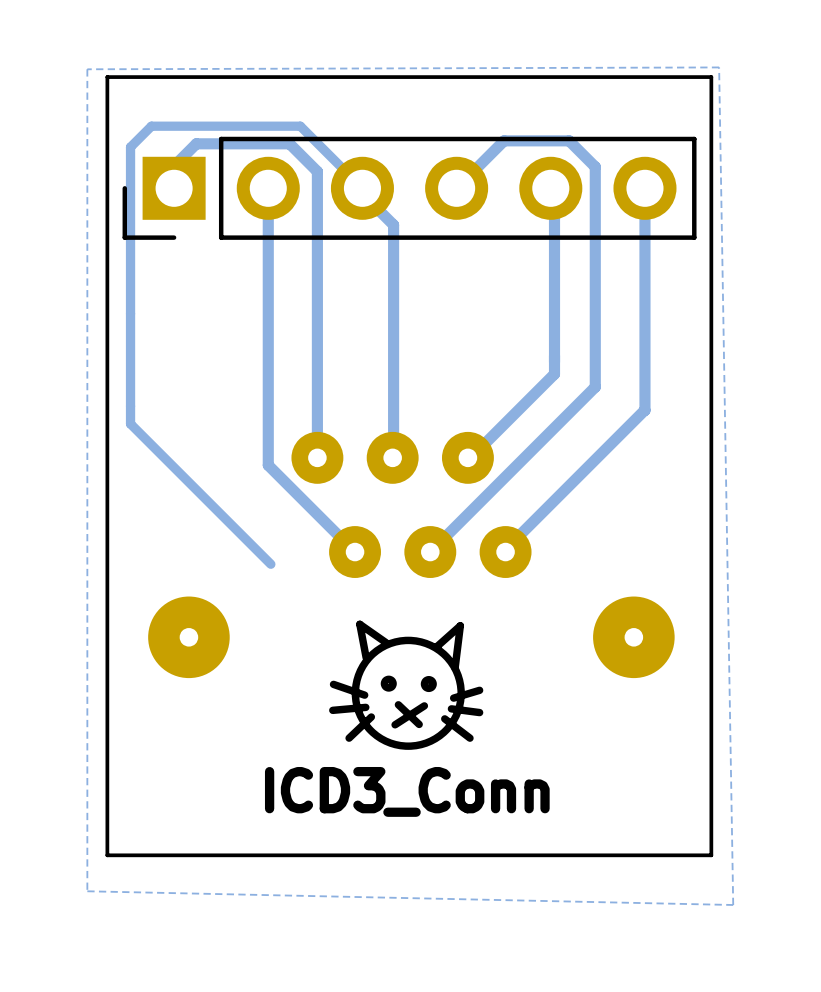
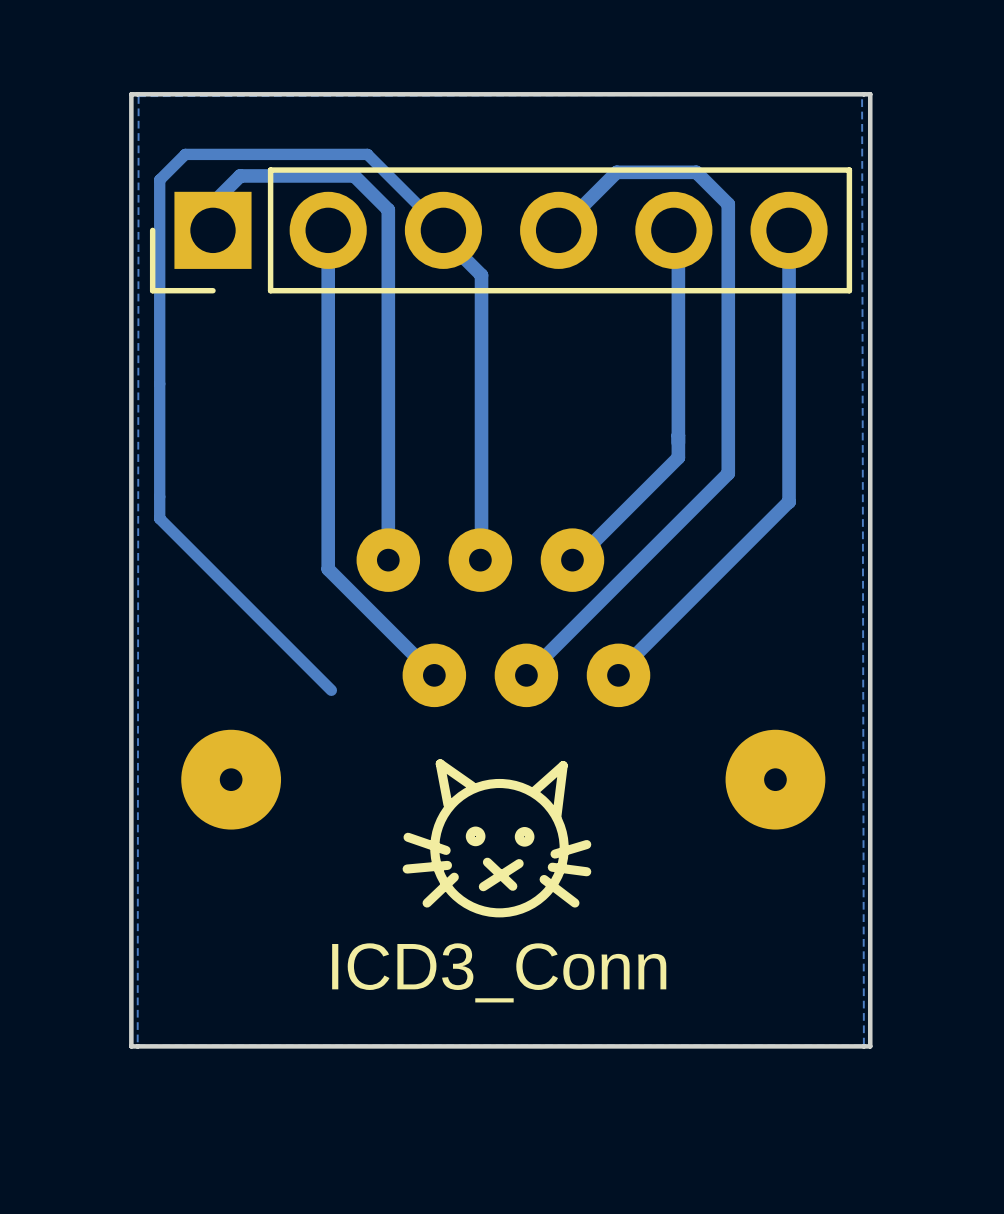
zone outline: (719, 67) (87, 69) (87, 891) (733, 905) (719, 67) -> (862, 94) (863, 1045) (137, 1045) (138, 96) (862, 94)

